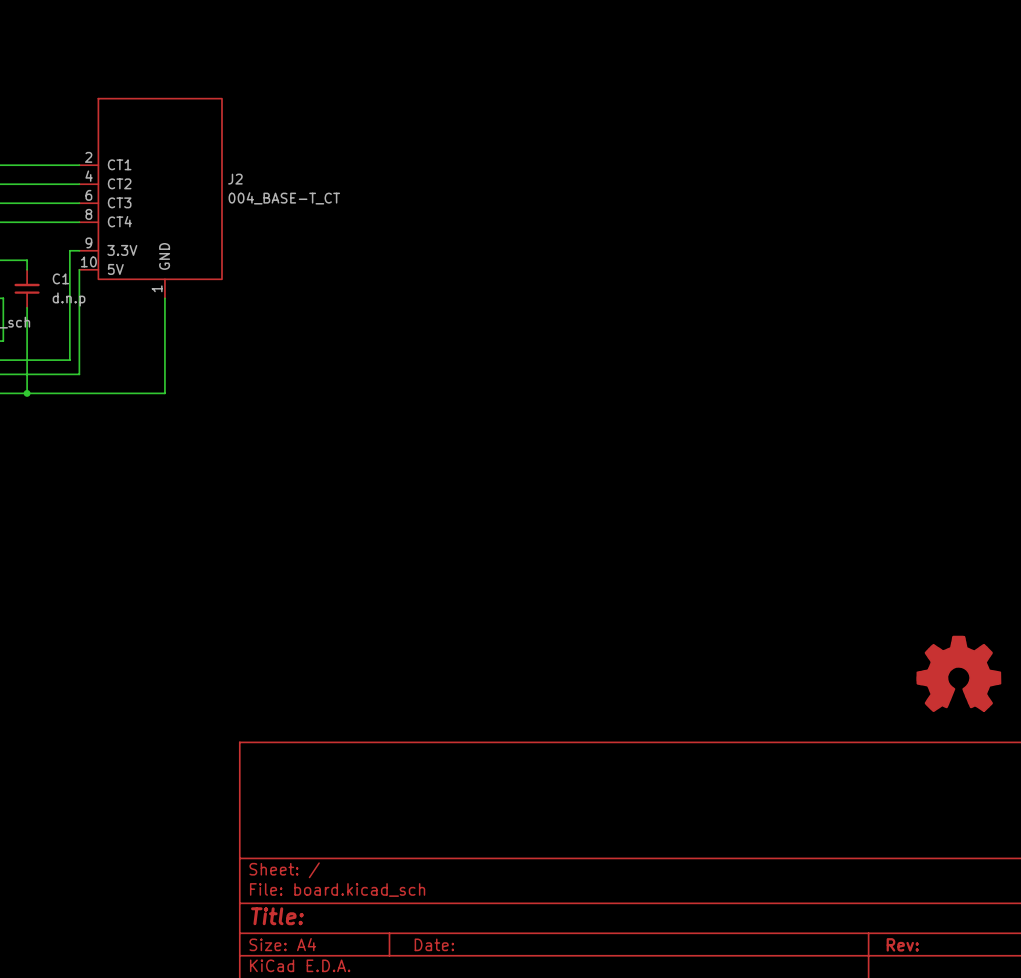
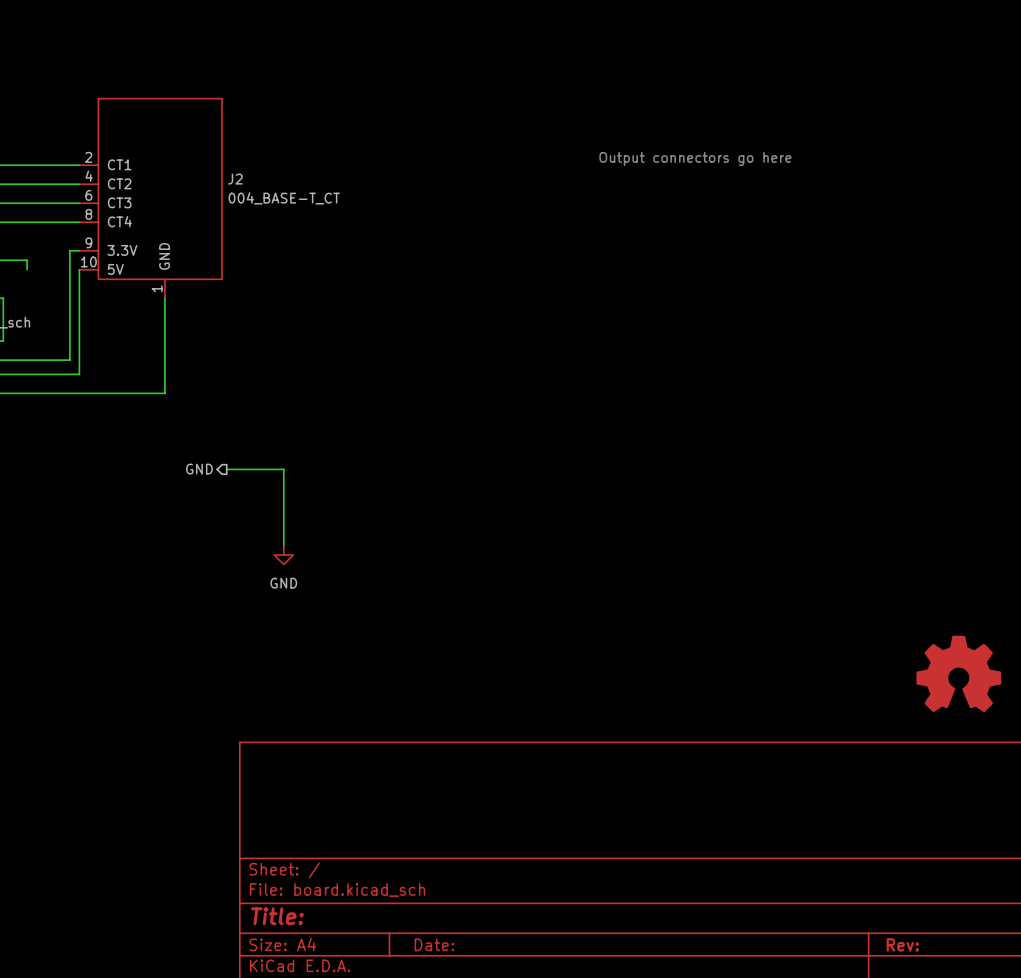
text: none -> Output connectors go here (695, 159)
C1: d.n.p (27, 288) -> none
wire: (27, 307) (27, 393) -> none
junction: (27, 393) -> none
sheet pin: none -> GND (199, 469)
wire: none -> (226, 469) (283, 469) (283, 545)
power symbol: none -> GND (283, 555)

